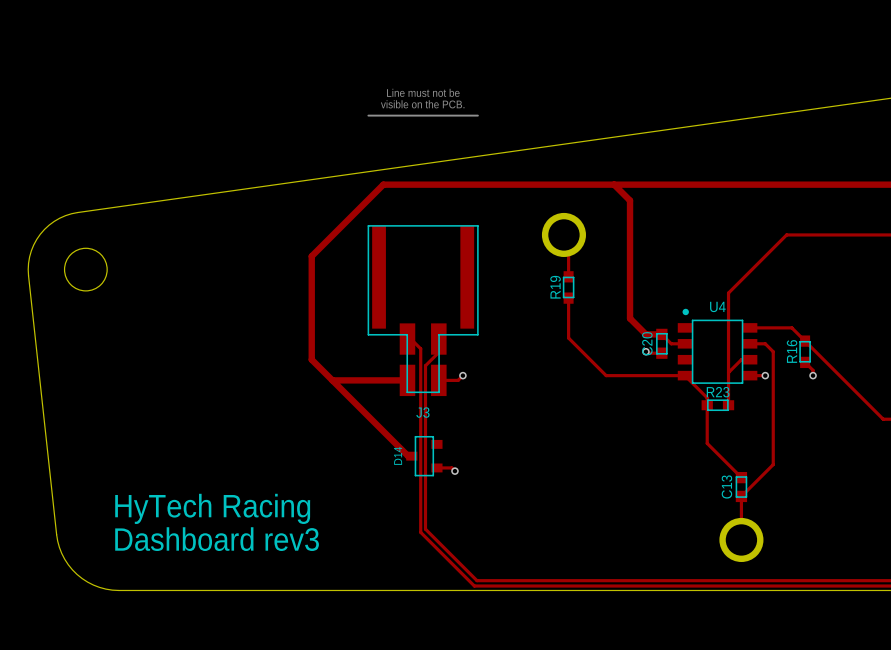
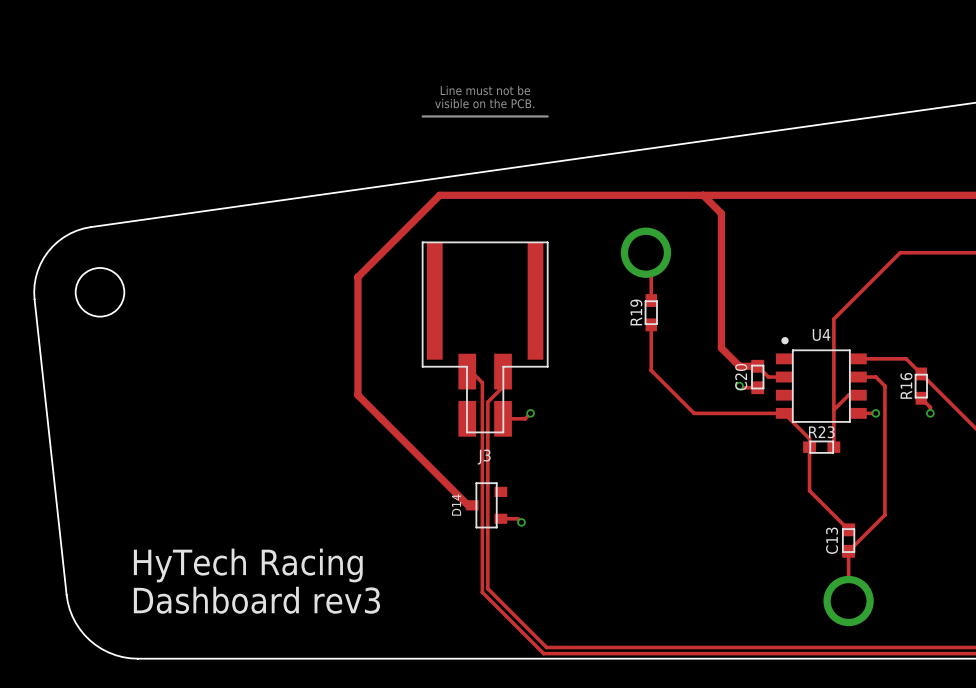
top track: (332, 380) (407, 380) -> none

